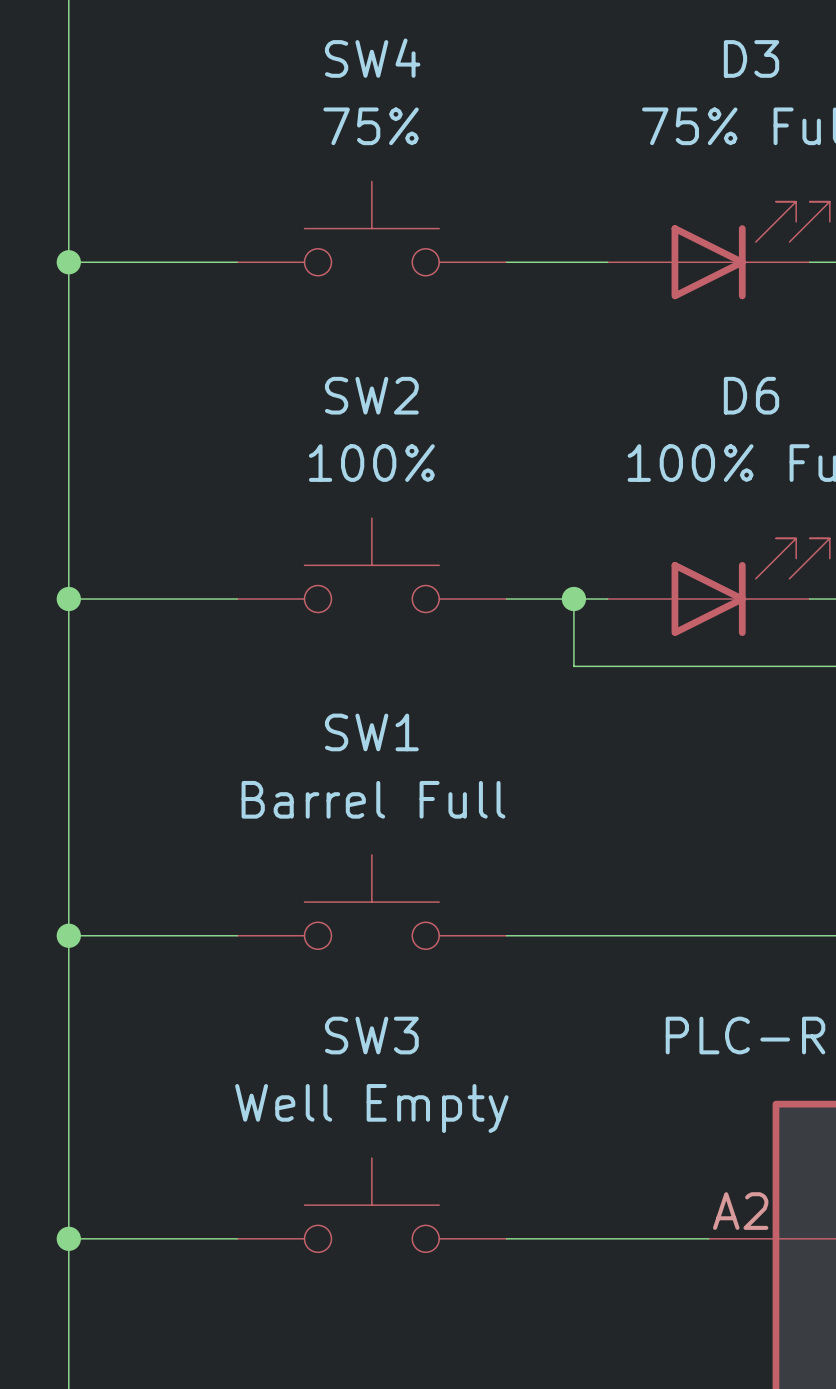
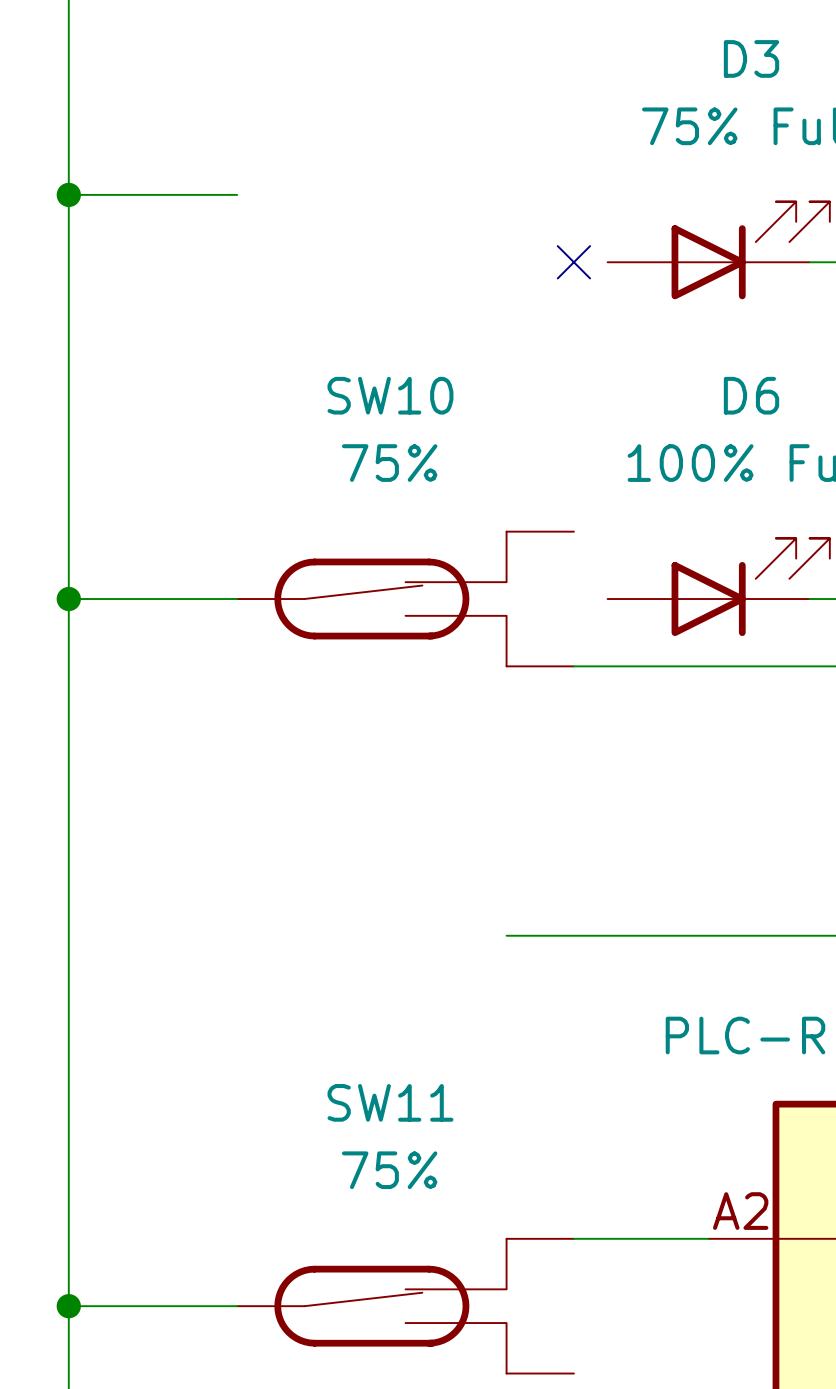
SW4: 75% (371, 228) -> none
wire: (68, 262) (237, 262) -> (68, 194) (237, 194)
junction position: (68, 262) -> (68, 194)
wire: (506, 262) (607, 262) -> none
no-connect mark: none -> (573, 262)
SW2: 100% (371, 565) -> none
SW10: none -> 75% (405, 599)
wire: (506, 599) (607, 599) -> none
wire: (573, 599) (573, 666) -> none
junction: (573, 599) -> none
SW1: Barrel Full (371, 902) -> none
wire: (68, 935) (237, 935) -> none
junction: (68, 935) -> none
SW3: Well Empty (371, 1205) -> none
wire: (68, 1238) (237, 1238) -> (68, 1306) (237, 1306)
junction position: (68, 1238) -> (68, 1306)
SW11: none -> 75% (405, 1306)

